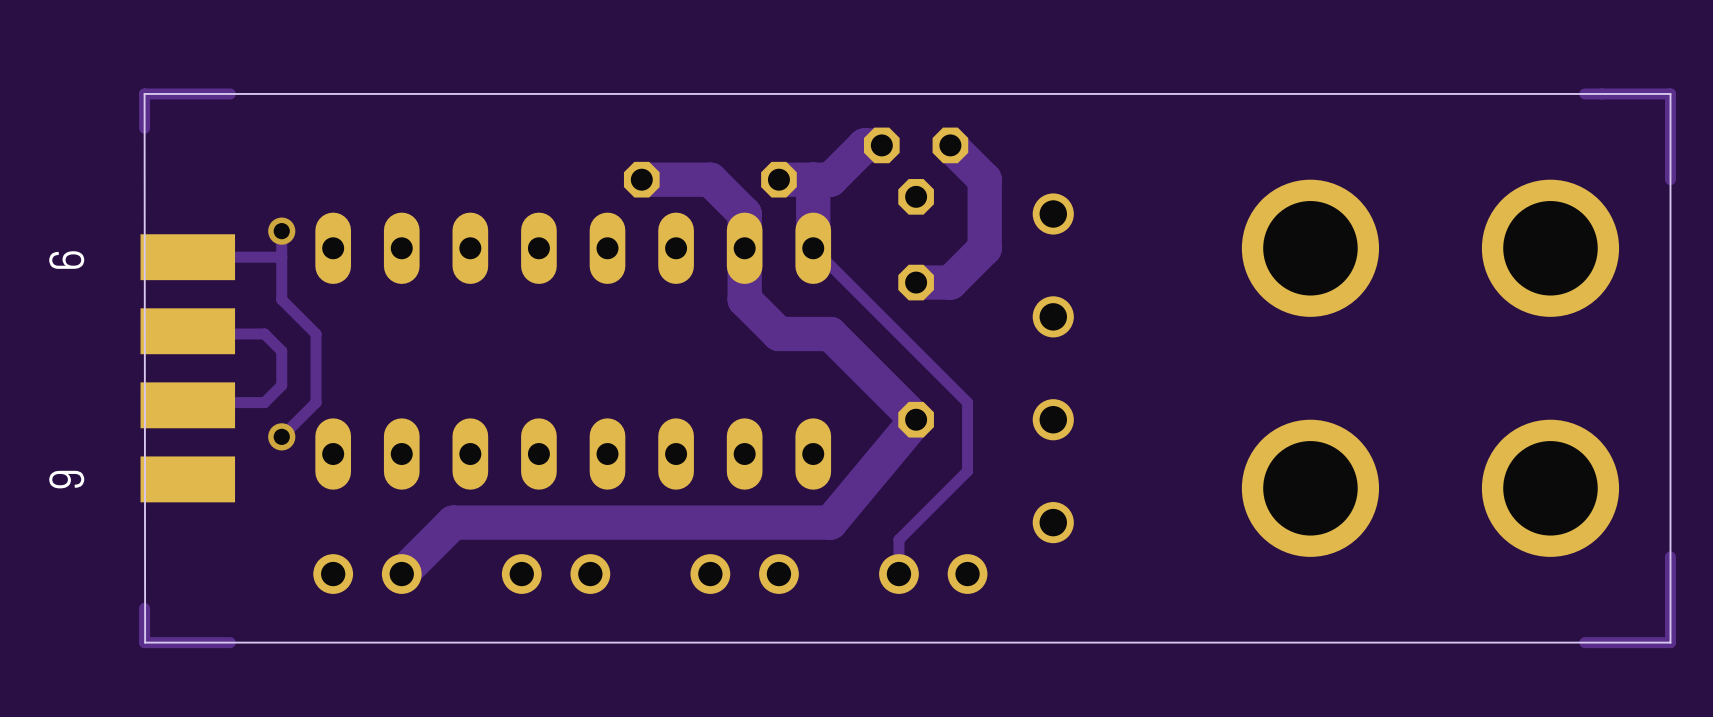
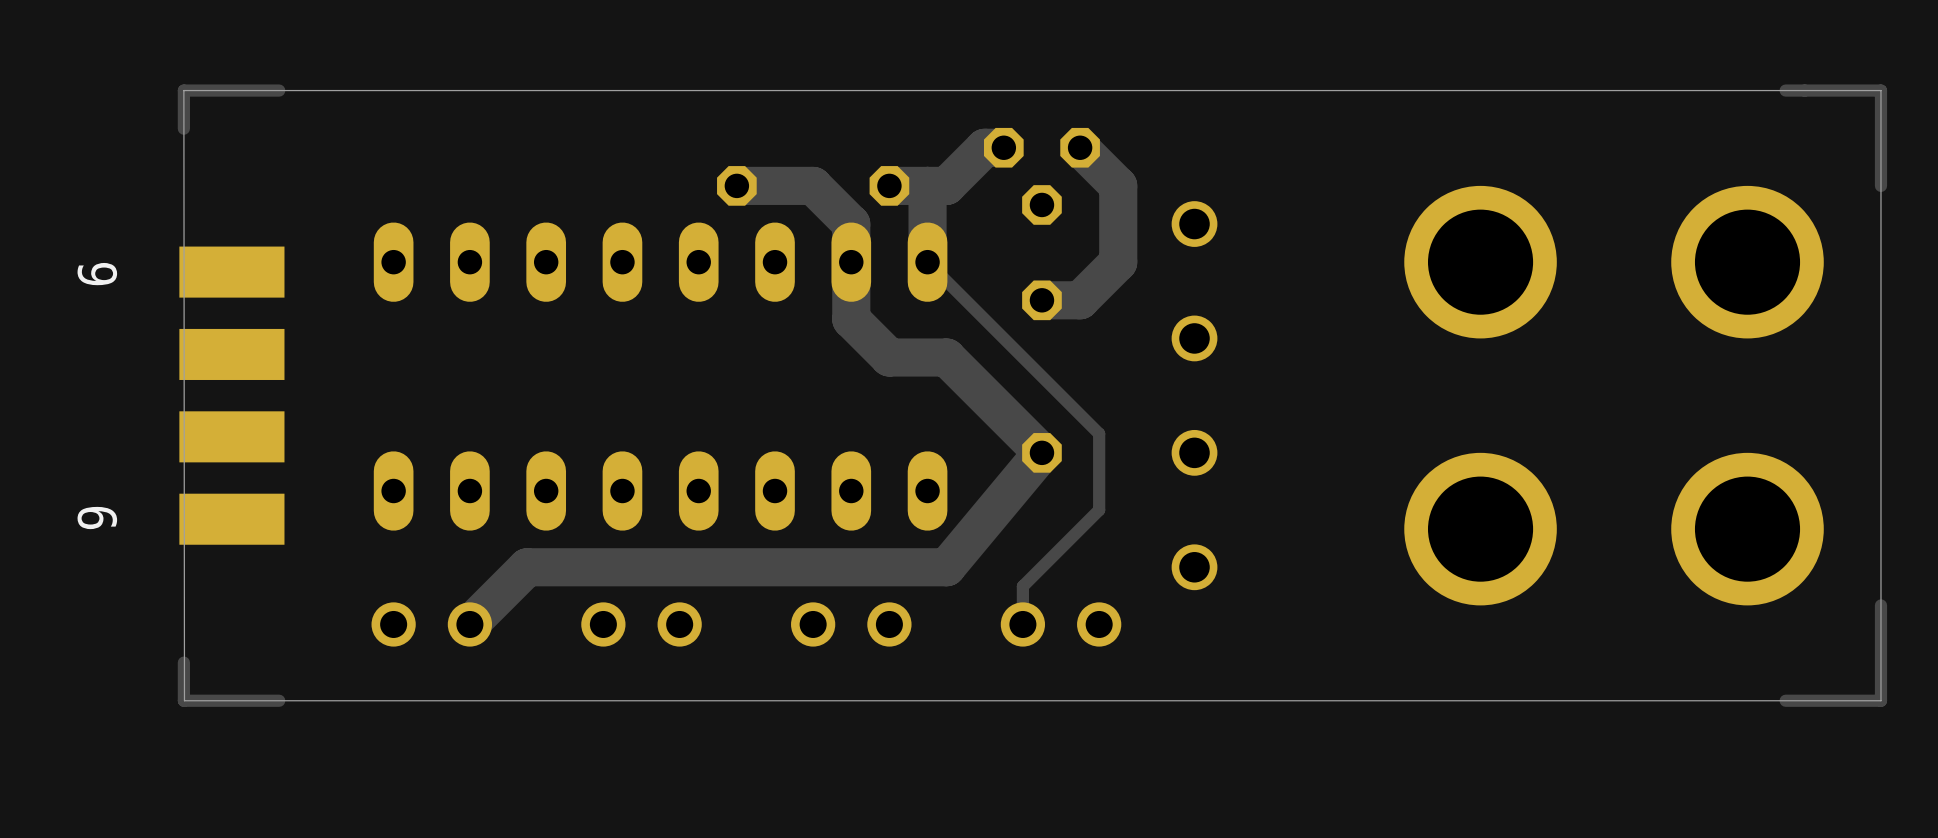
track: (281, 231) (281, 299) (316, 334) (316, 402) (281, 436) -> none
via: (281, 231) -> none
track: (281, 257) (187, 257) -> none
track: (187, 331) (193, 331) (196, 334) (264, 334) (281, 351) (281, 385) (264, 402) (187, 402) (187, 405) -> none
via: (281, 436) -> none

